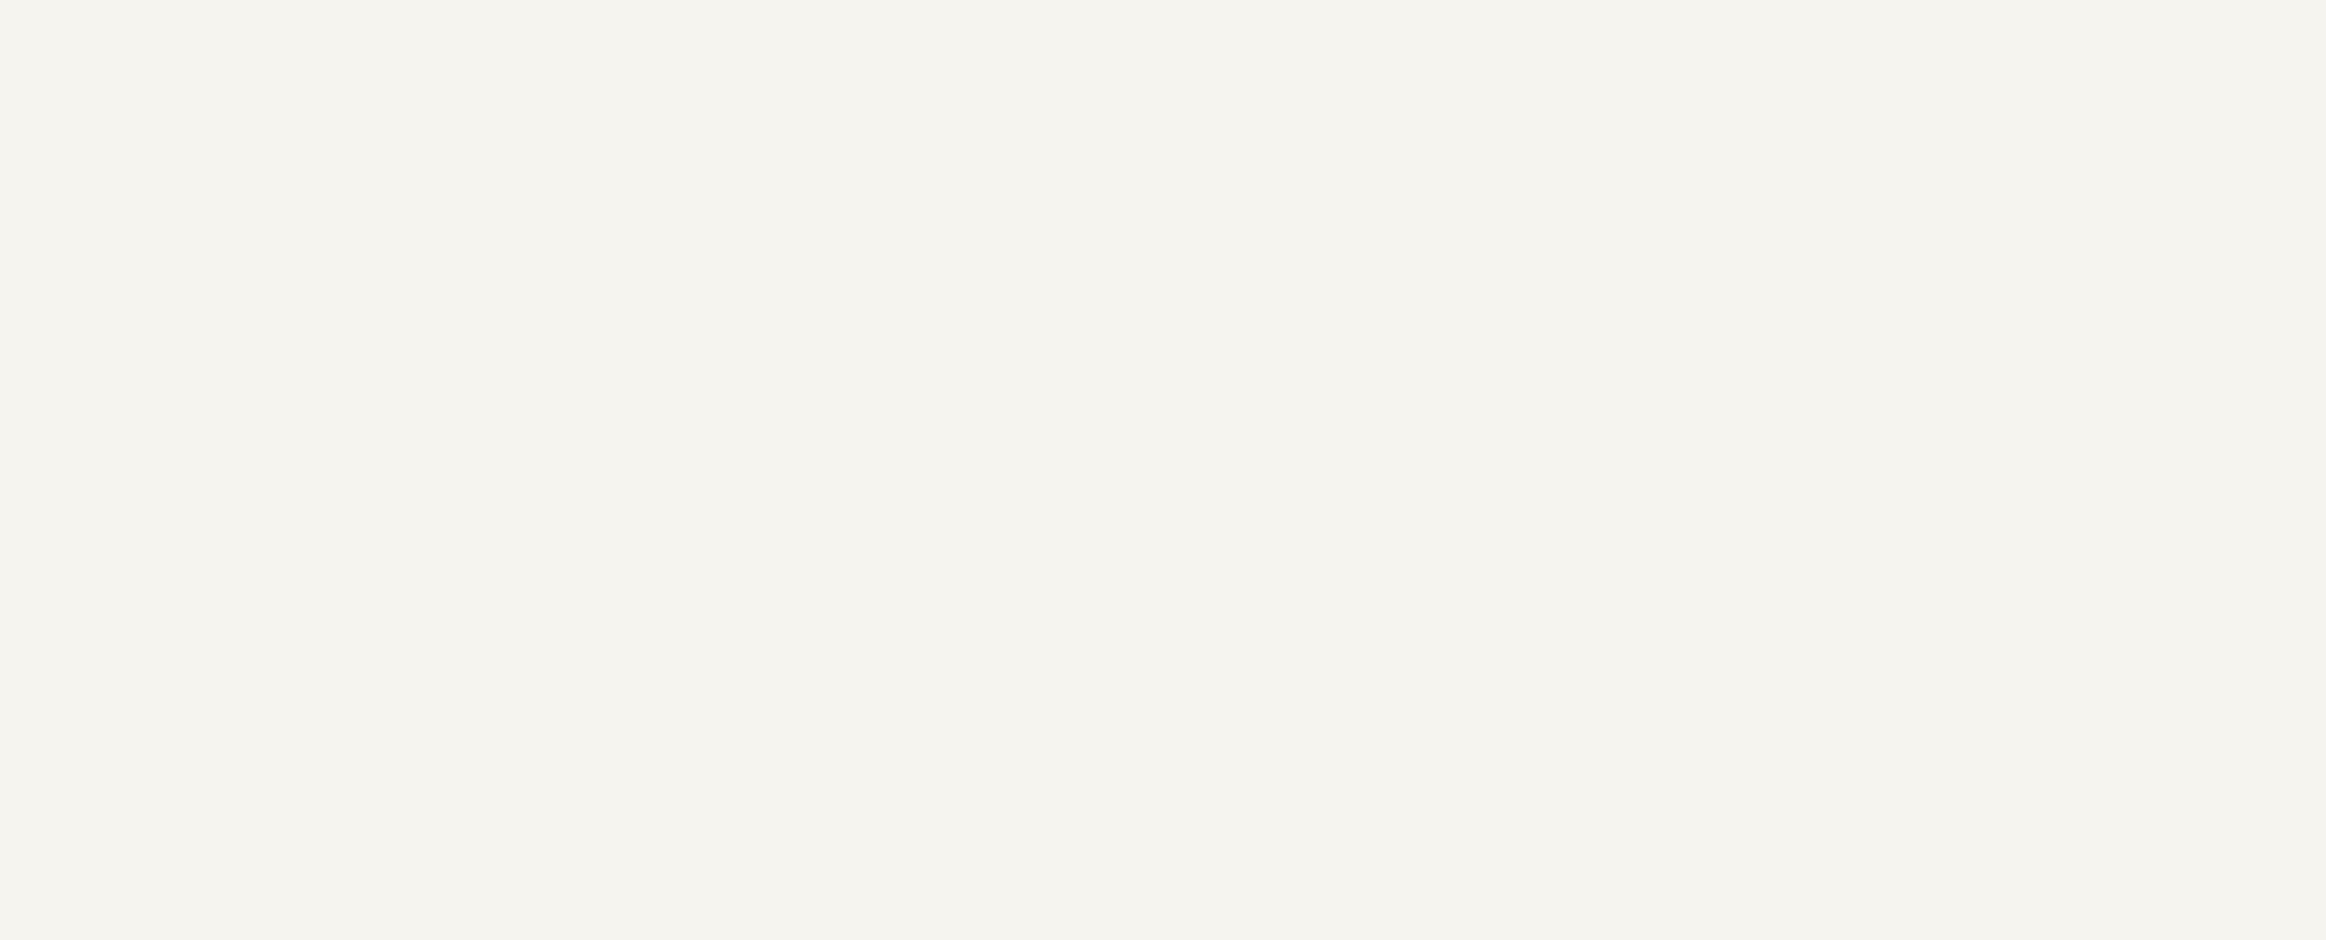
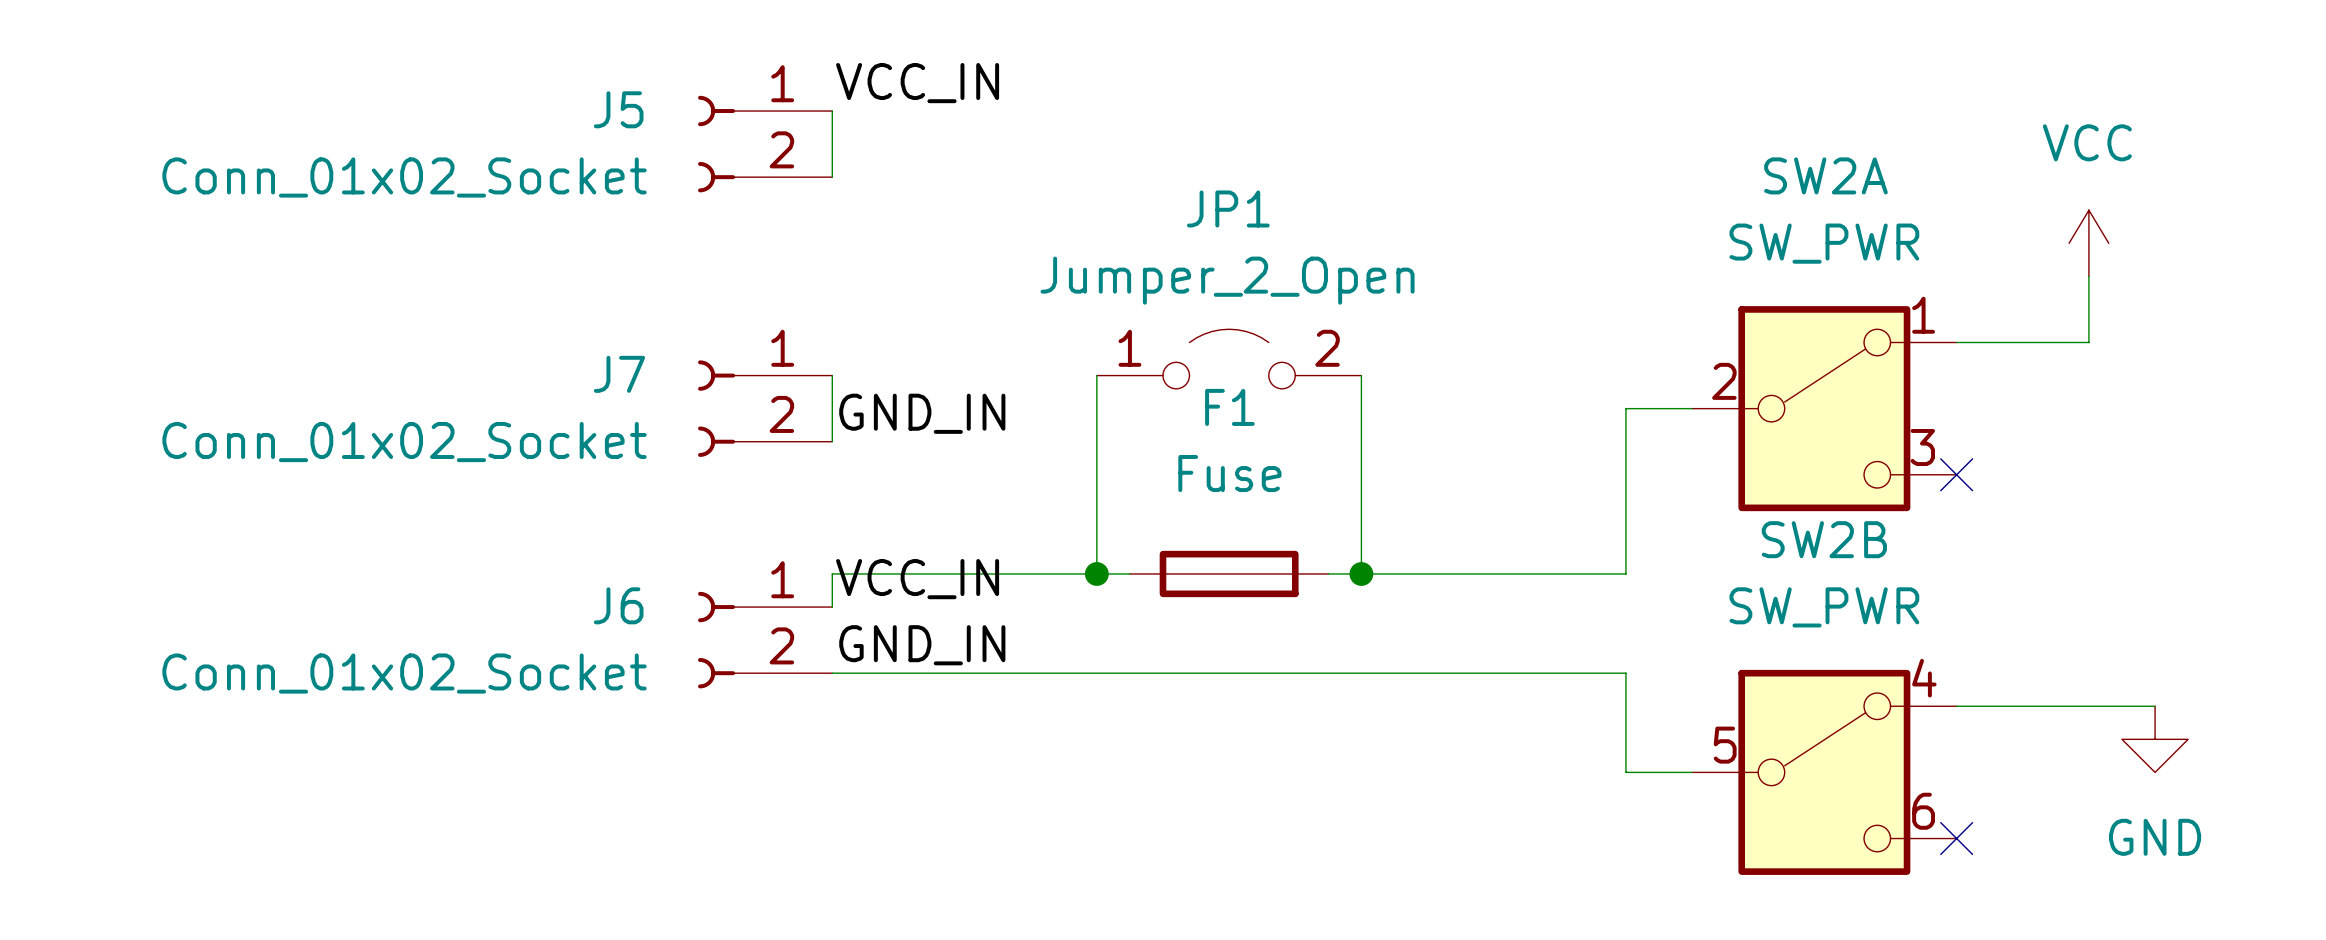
label: none -> VCC_IN (917, 83)
wire: none -> (832, 111) (832, 177)
J5: none -> Conn_01x02_Socket (765, 144)
power symbol: none -> VCC (2088, 243)
wire: none -> (2088, 276) (2088, 342) (1956, 342)
JP1: none -> Jumper_2_Open (1229, 359)
wire: none -> (832, 375) (832, 441)
wire: none -> (1096, 375) (1096, 573)
wire: none -> (1361, 375) (1361, 573)
J7: none -> Conn_01x02_Socket (765, 408)
wire: none -> (1692, 408) (1625, 408) (1625, 573) (1328, 573)
SW2A: none -> SW_PWR (1824, 408)
label: none -> GND_IN (922, 413)
no-connect mark: none -> (1956, 474)
junction: none -> (1096, 573)
wire: none -> (1129, 573) (832, 573) (832, 607)
F1: none -> Fuse (1229, 573)
junction: none -> (1361, 573)
label: none -> VCC_IN (917, 579)
J6: none -> Conn_01x02_Socket (765, 640)
label: none -> GND_IN (922, 645)
wire: none -> (832, 673) (1625, 673) (1625, 772) (1692, 772)
wire: none -> (1956, 706) (2155, 706)
power symbol: none -> GND (2155, 739)
SW2B: none -> SW_PWR (1824, 772)
no-connect mark: none -> (1956, 838)

